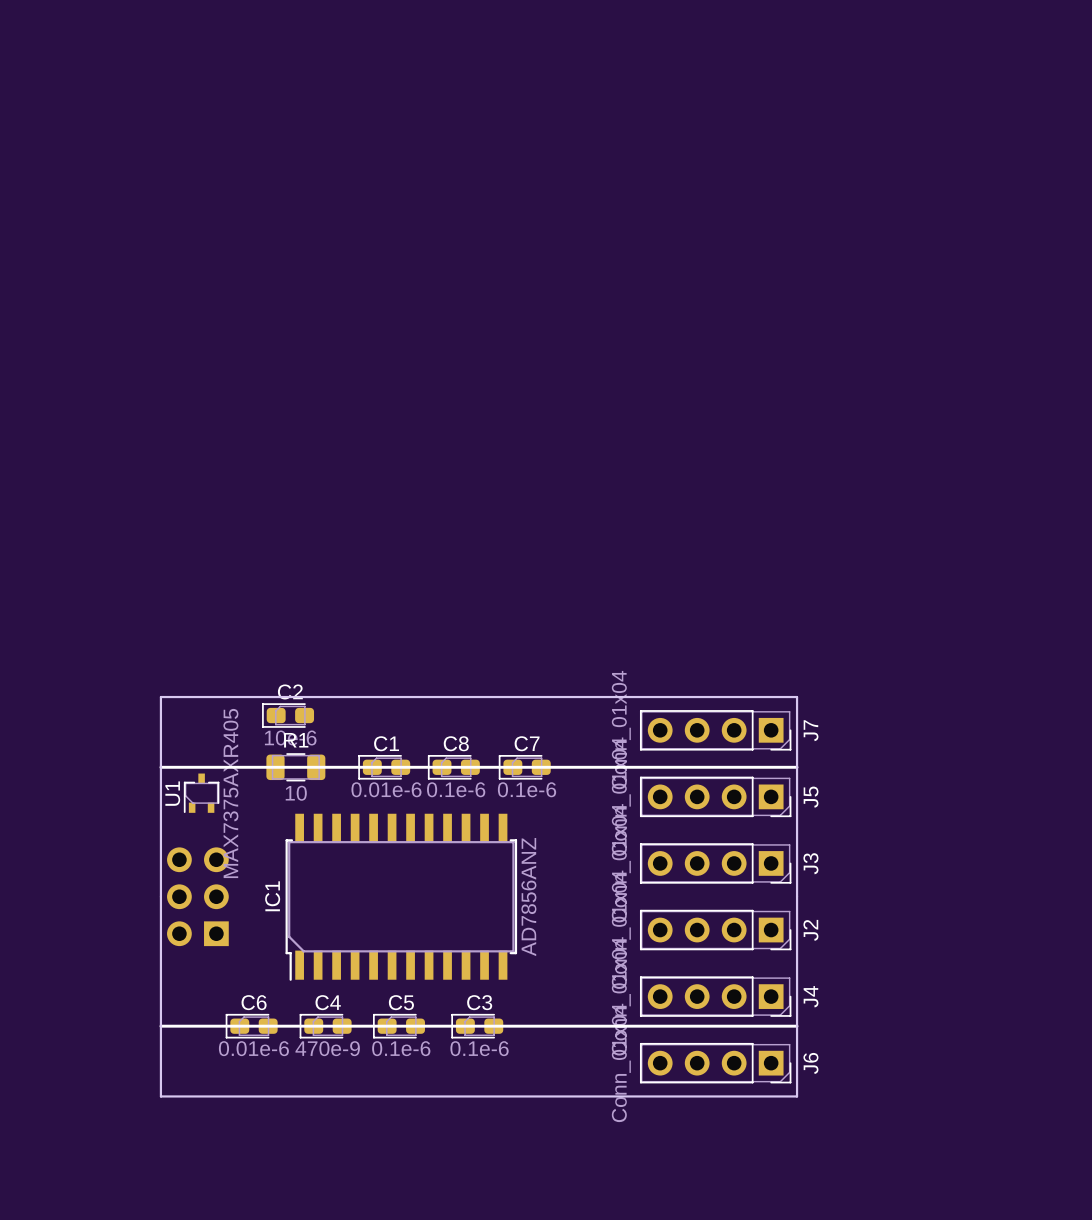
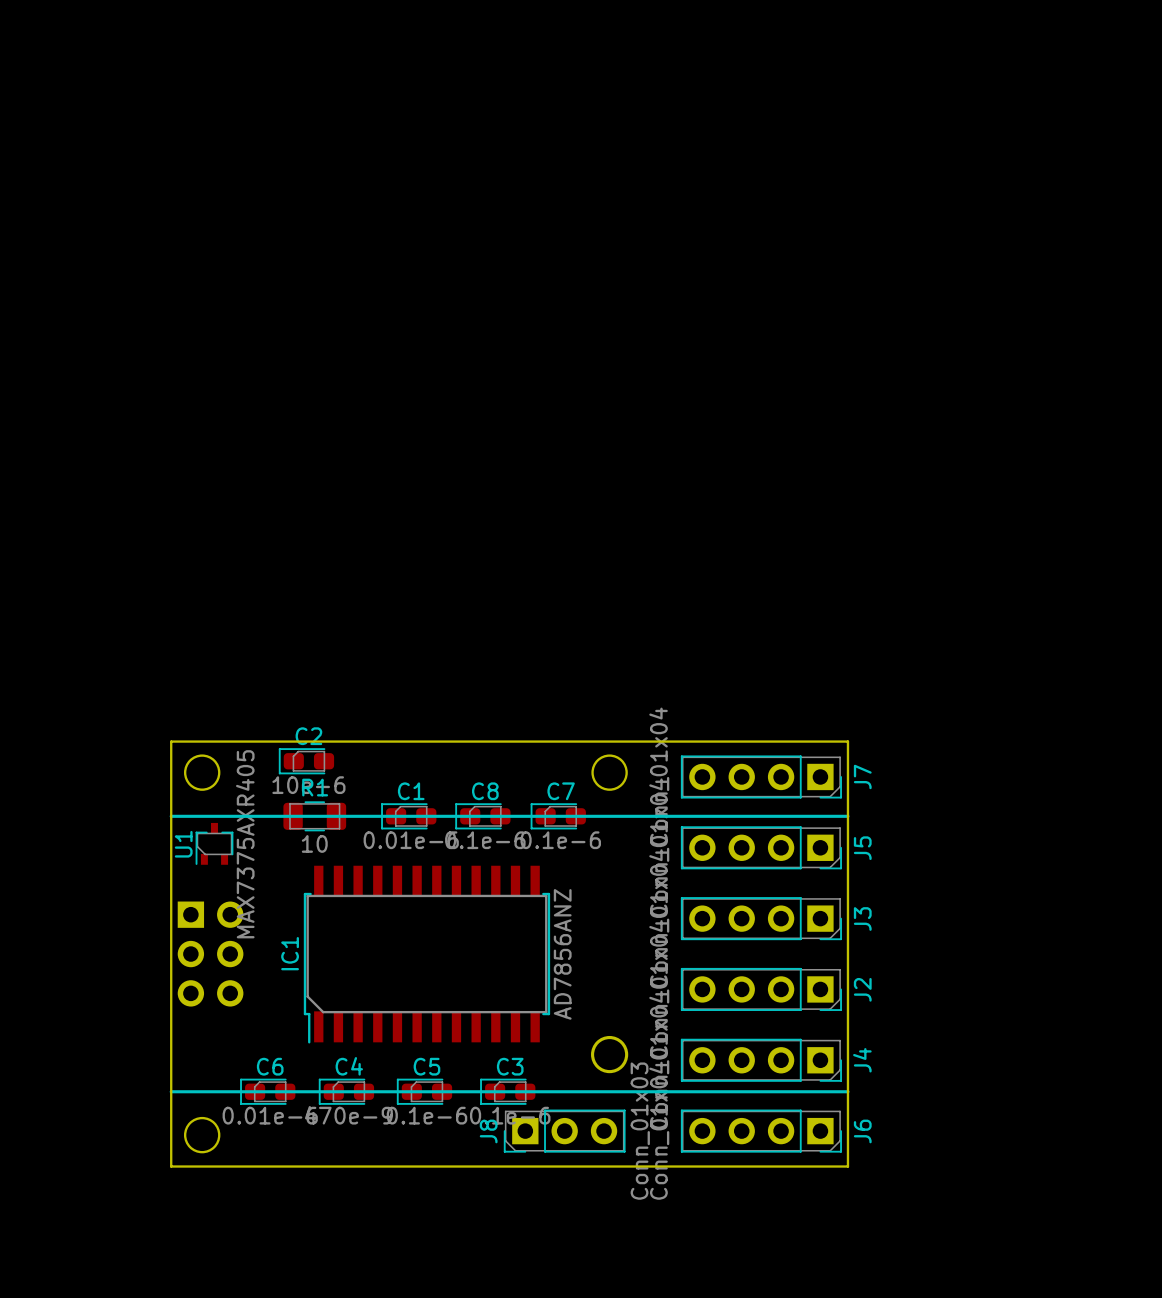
round board edge: none -> [183, 754, 221, 791]
round board edge: none -> [591, 754, 628, 791]
part rotation: 0° (197, 896) -> 180° (210, 954)
round board edge: none -> [591, 1035, 629, 1074]
round board edge: none -> [183, 1116, 221, 1154]
J8: none -> Conn_01x03 (564, 1131)

